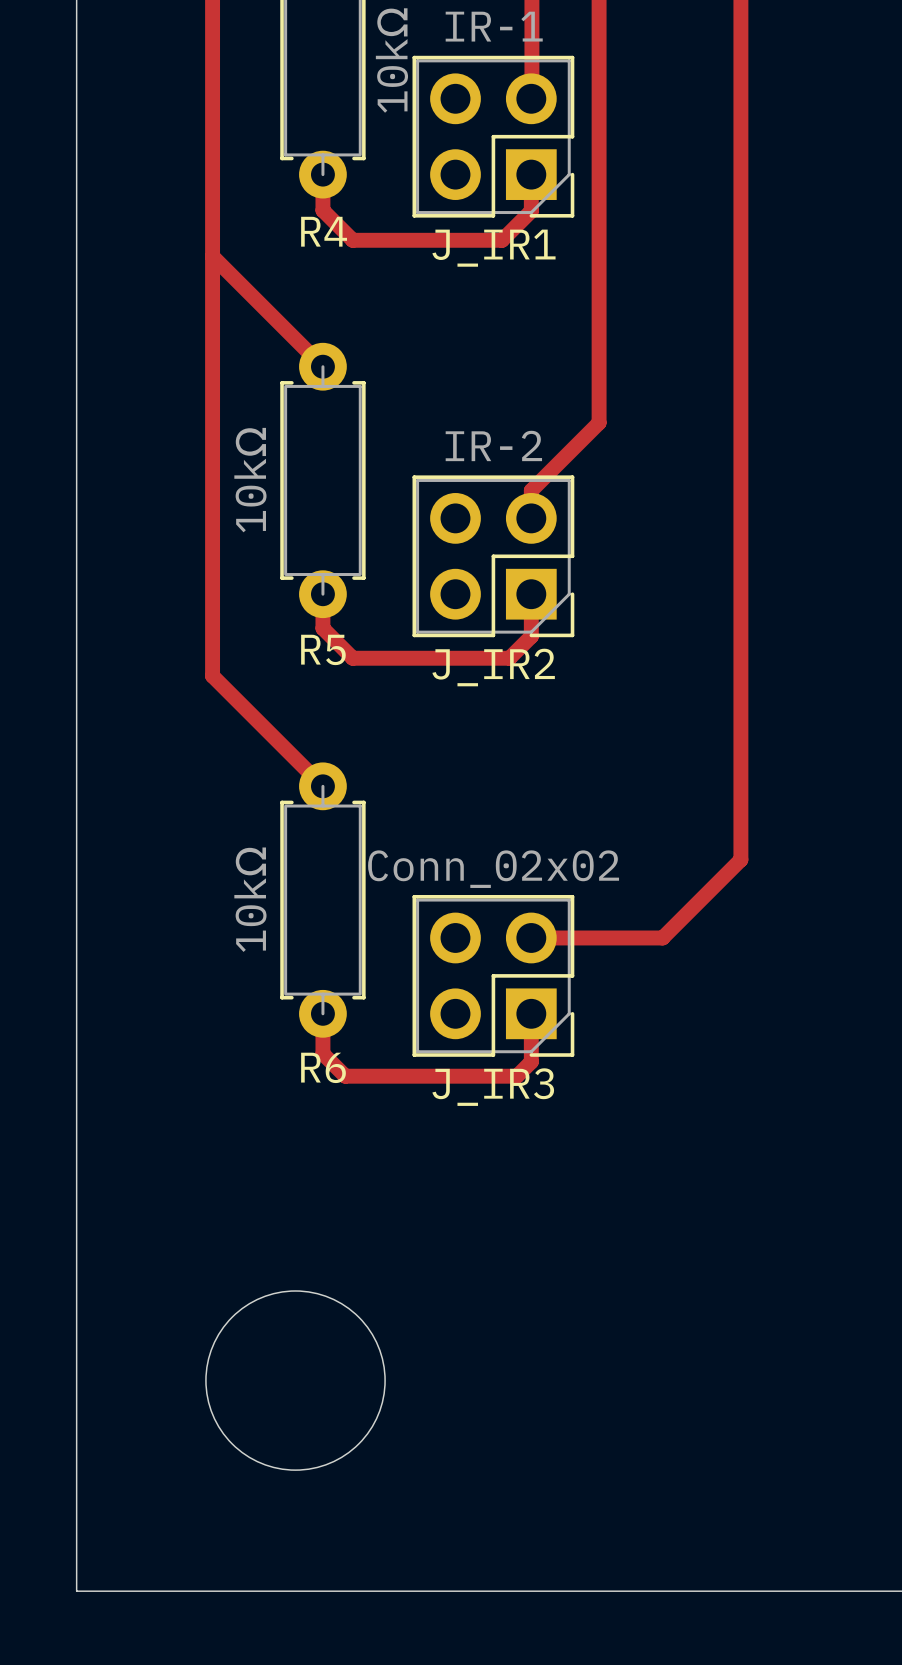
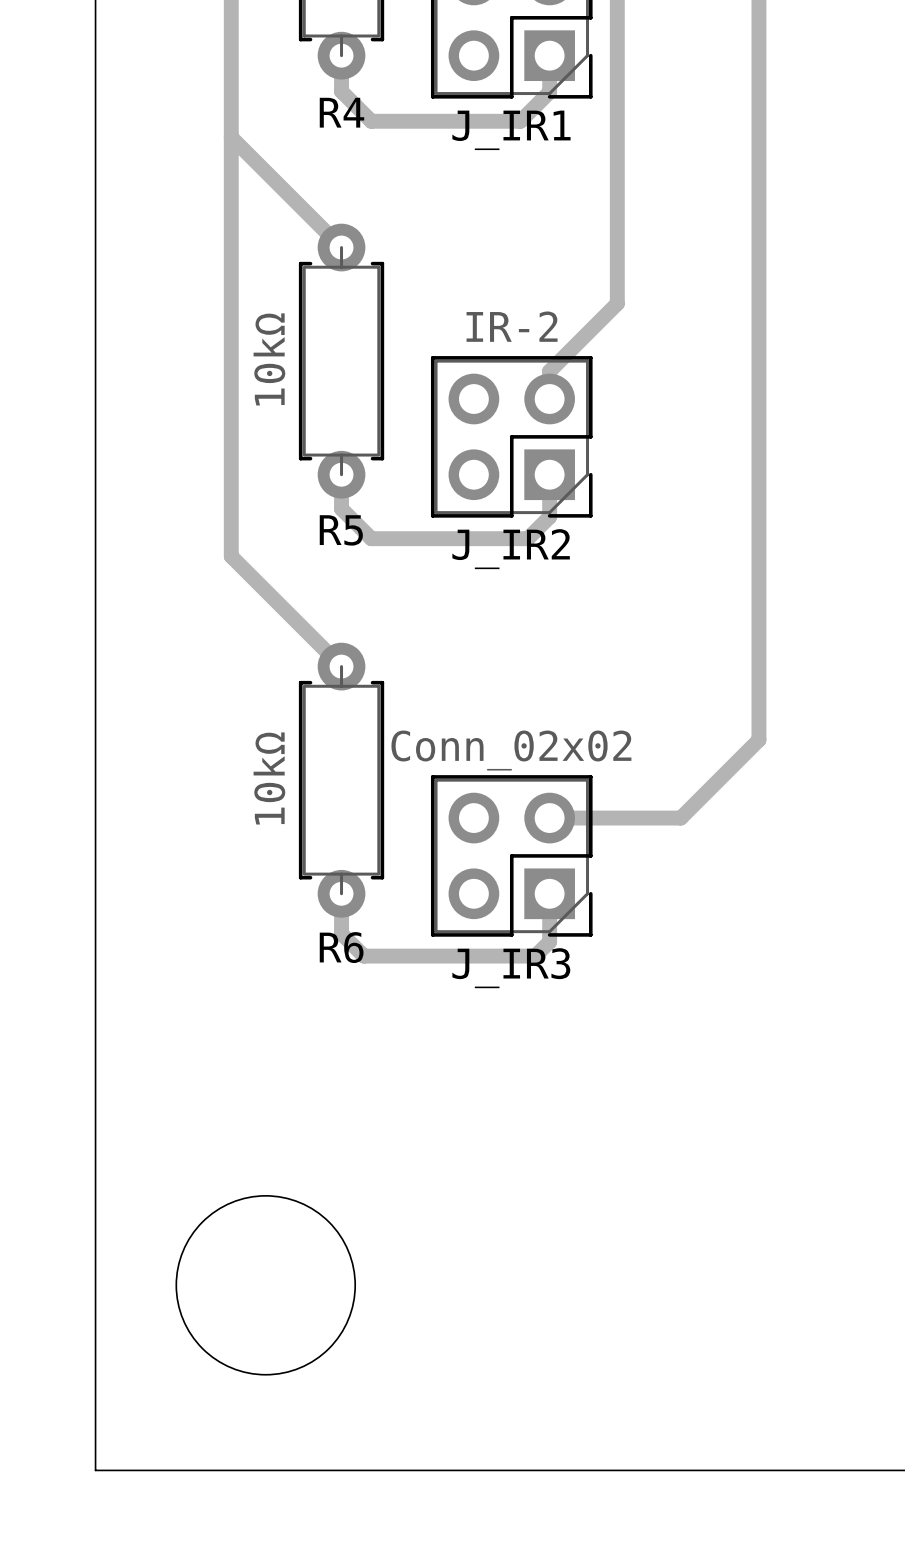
round board edge position: (295, 1380) -> (265, 1285)

